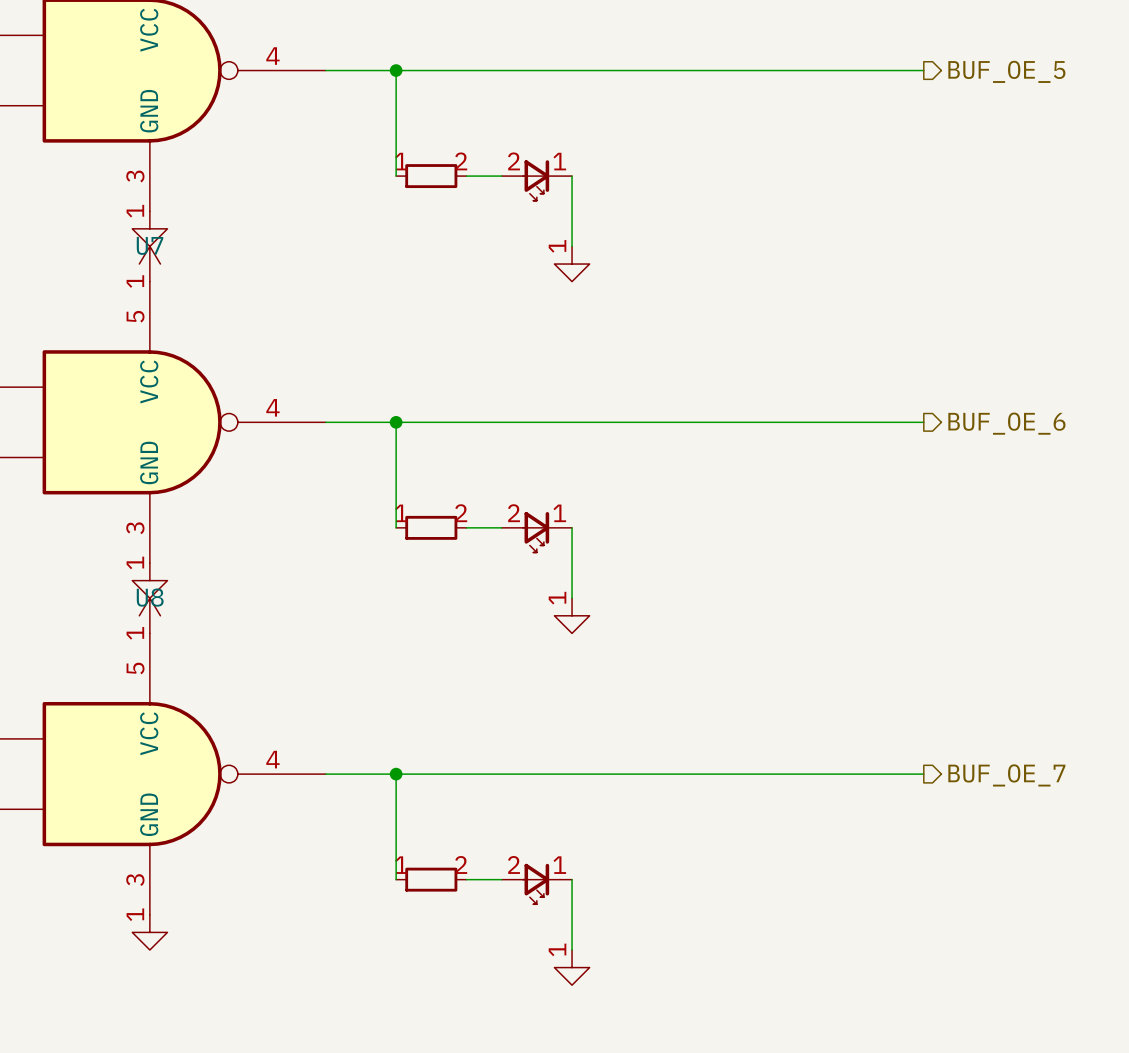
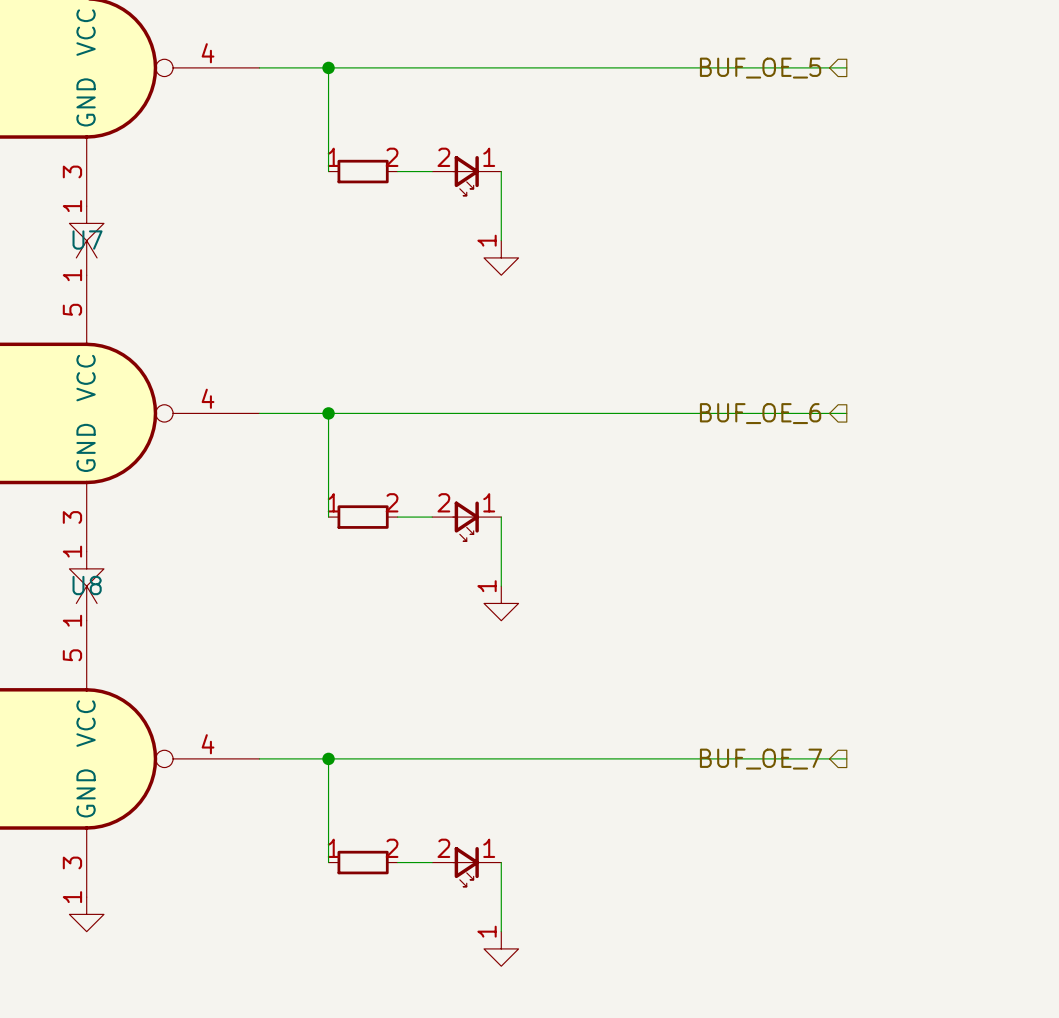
hierarchical label rotation: 0° (1006, 71) -> 180° (760, 68)
hierarchical label position: BUF_OE_5 (1006, 71) -> BUF_OE_5 (760, 68)
hierarchical label rotation: 0° (1006, 423) -> 180° (760, 413)
hierarchical label position: BUF_OE_6 (1006, 423) -> BUF_OE_6 (760, 413)
hierarchical label rotation: 0° (1006, 775) -> 180° (760, 759)
hierarchical label position: BUF_OE_7 (1006, 775) -> BUF_OE_7 (760, 759)

